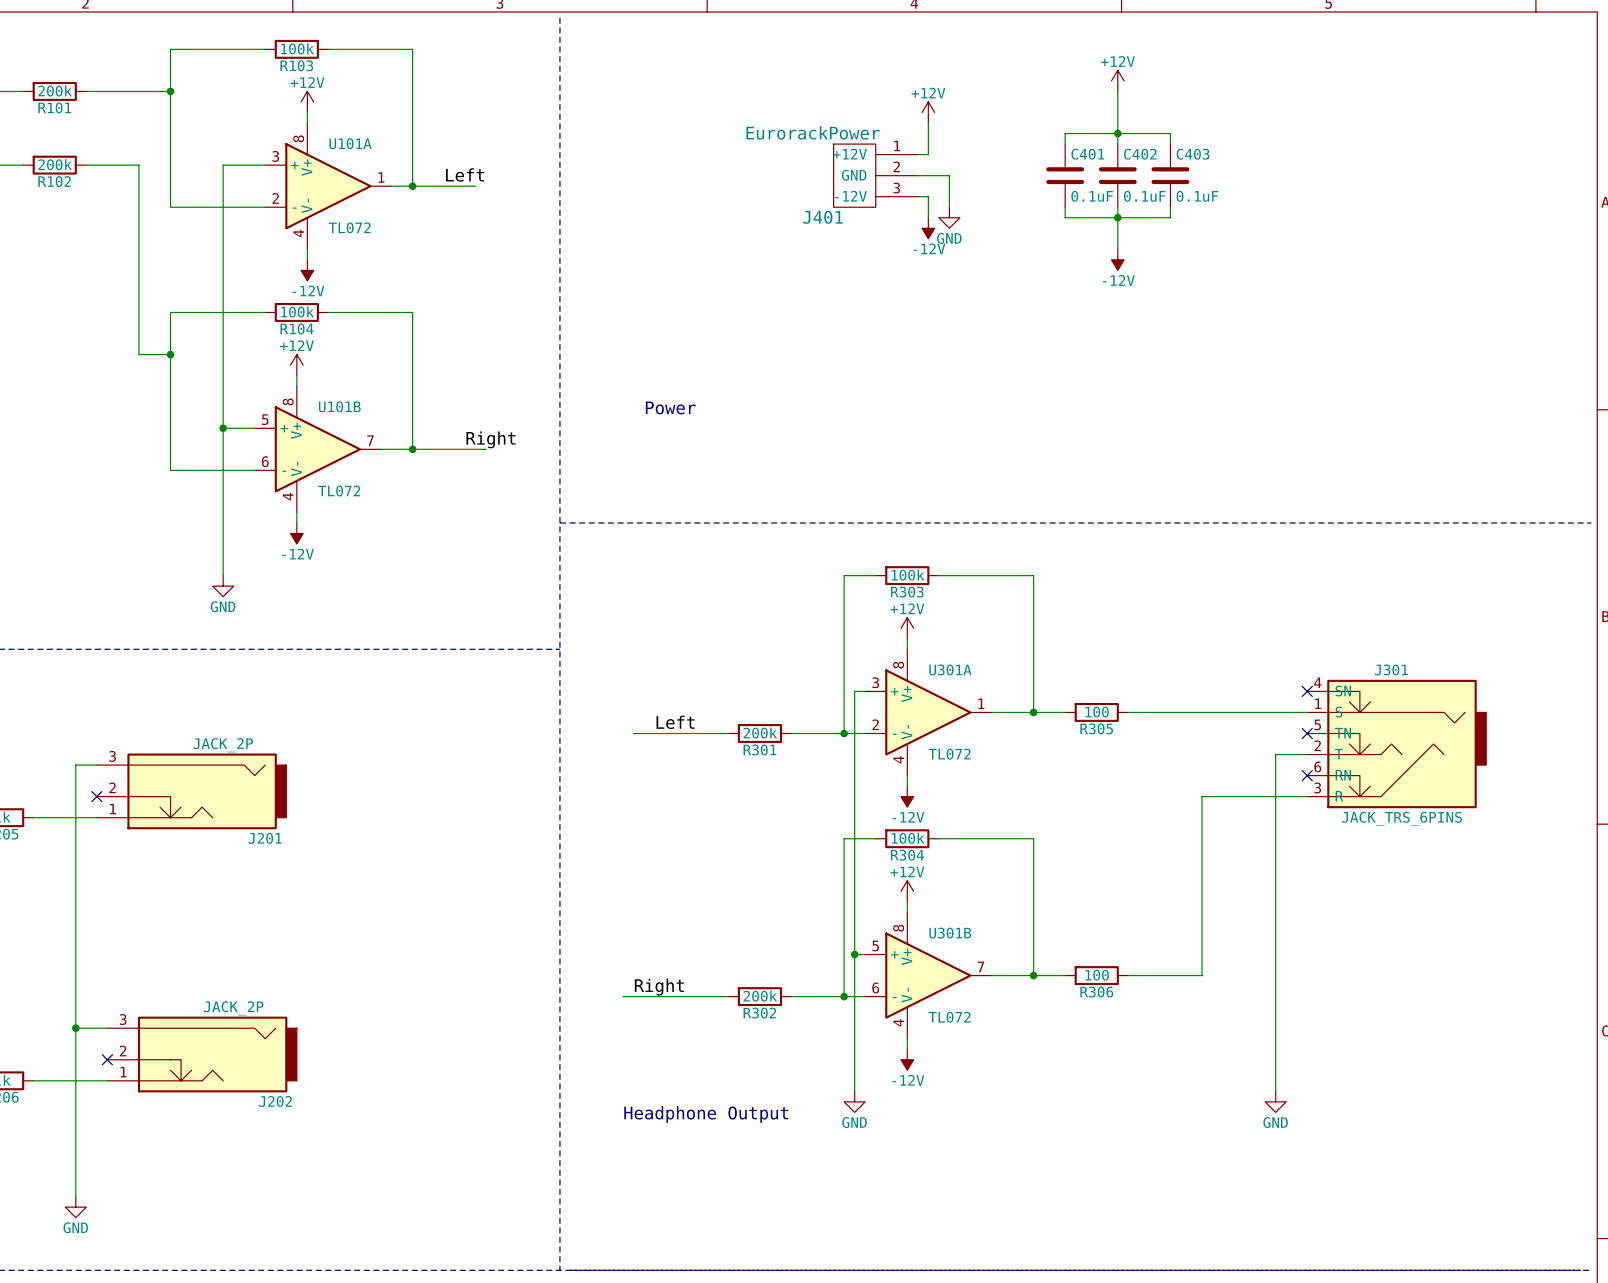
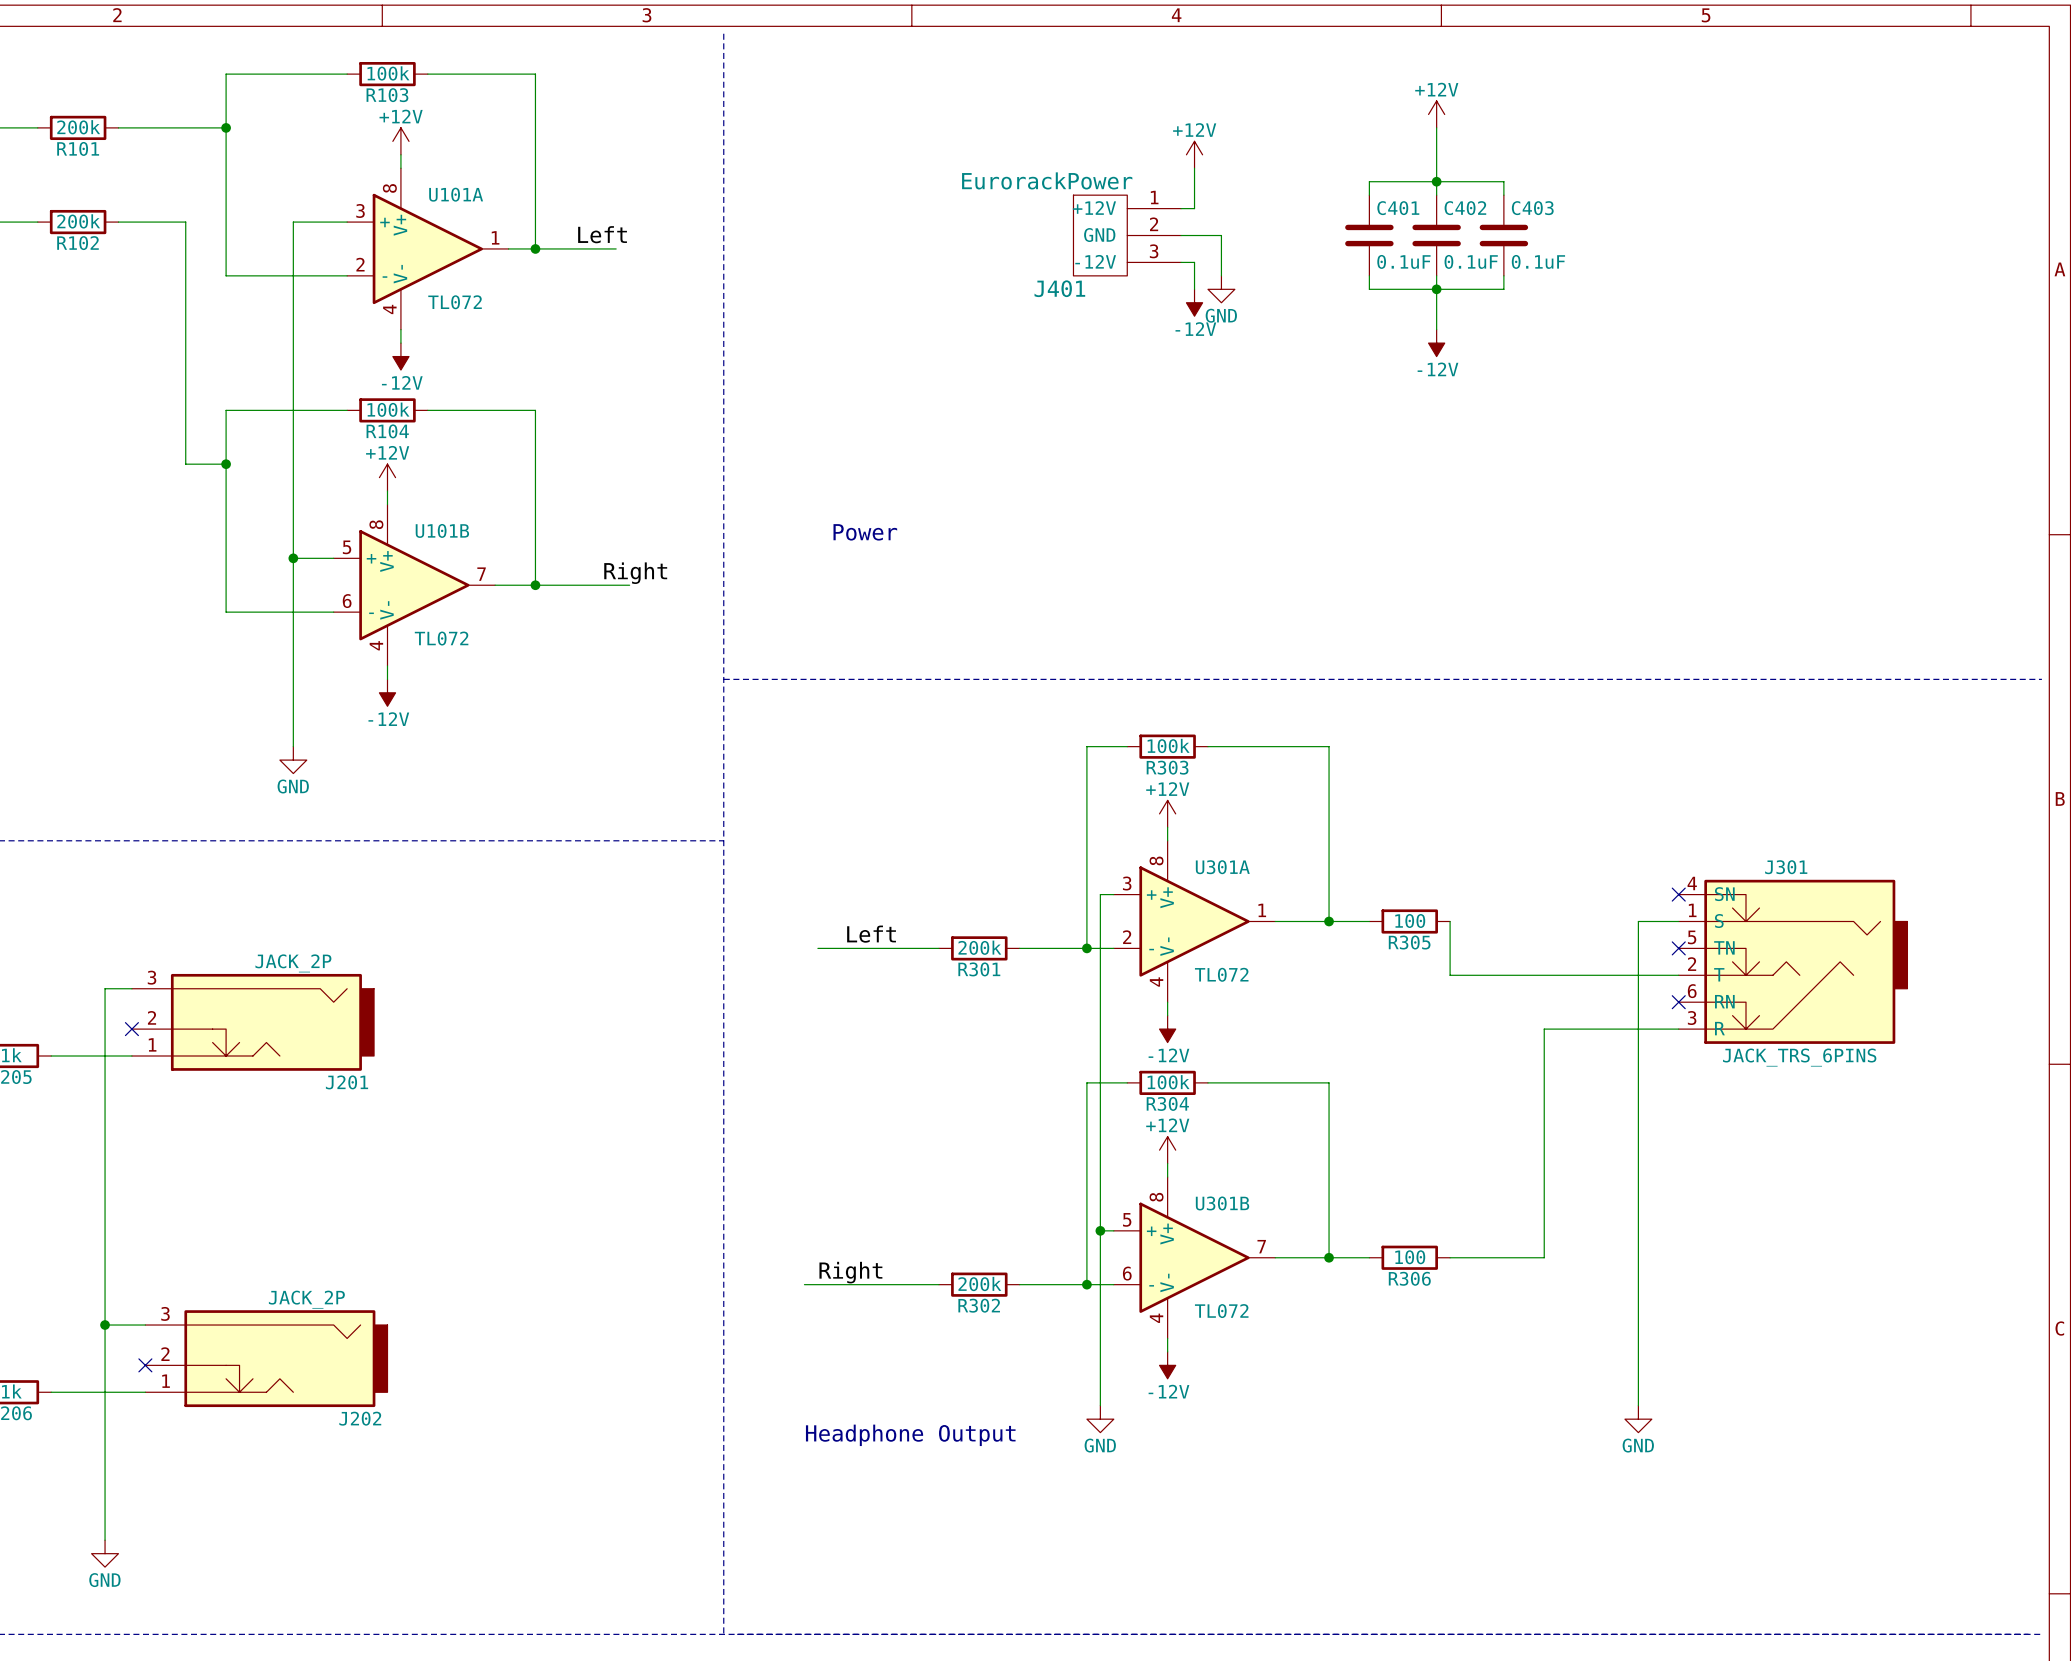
wire: (1128, 712) (1275, 712) -> (1450, 921) (1450, 975) (1638, 975) (1638, 921)

